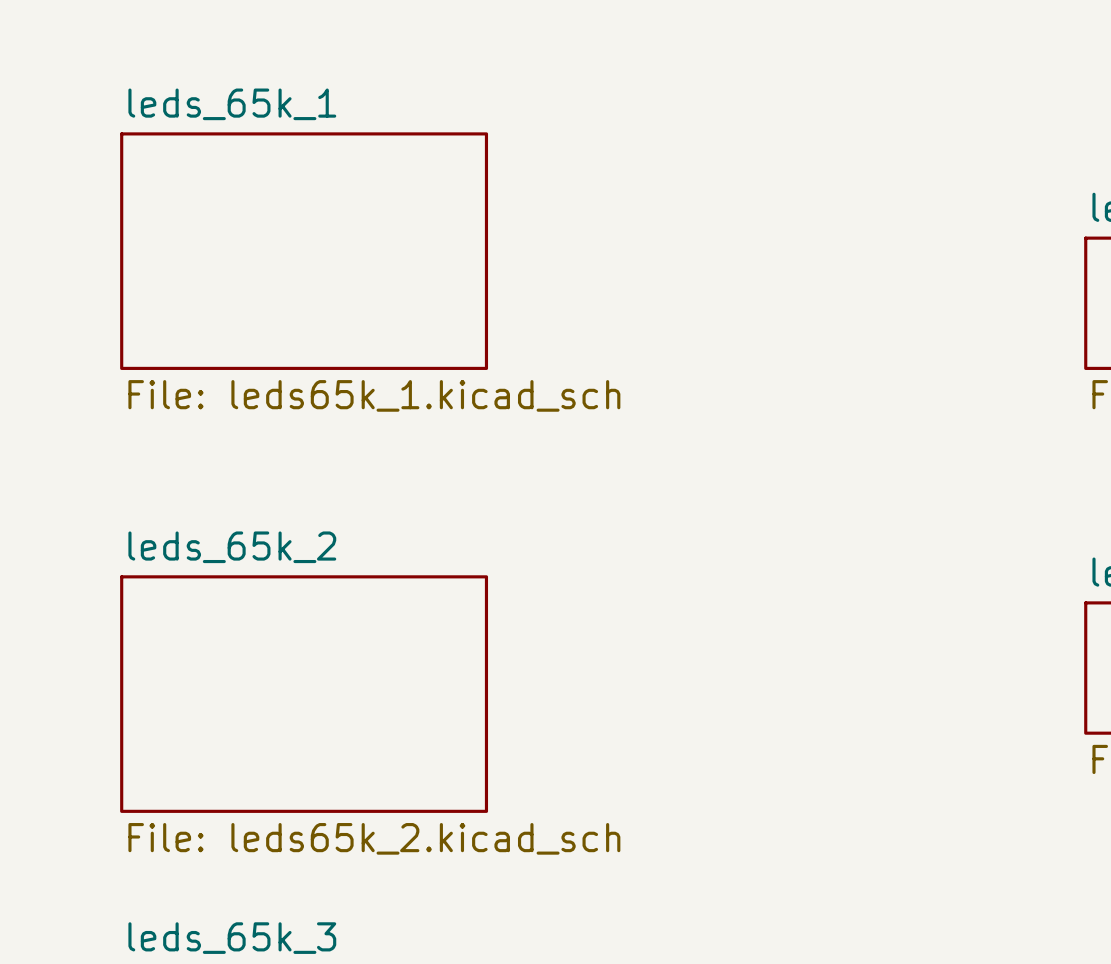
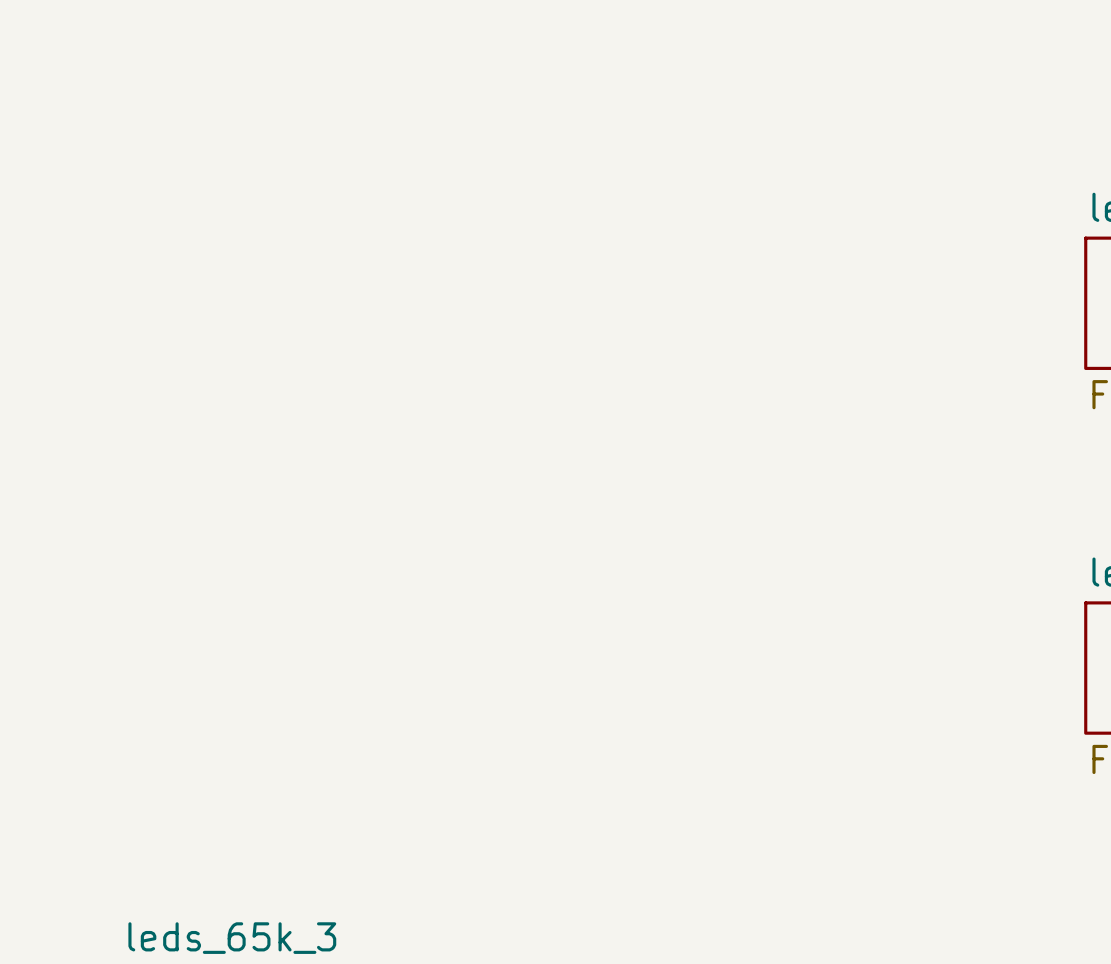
sheet leds_65k_1: File: leds65k_1.kicad_sch (304, 251) -> none
sheet leds_65k_2: File: leds65k_2.kicad_sch (304, 694) -> none

